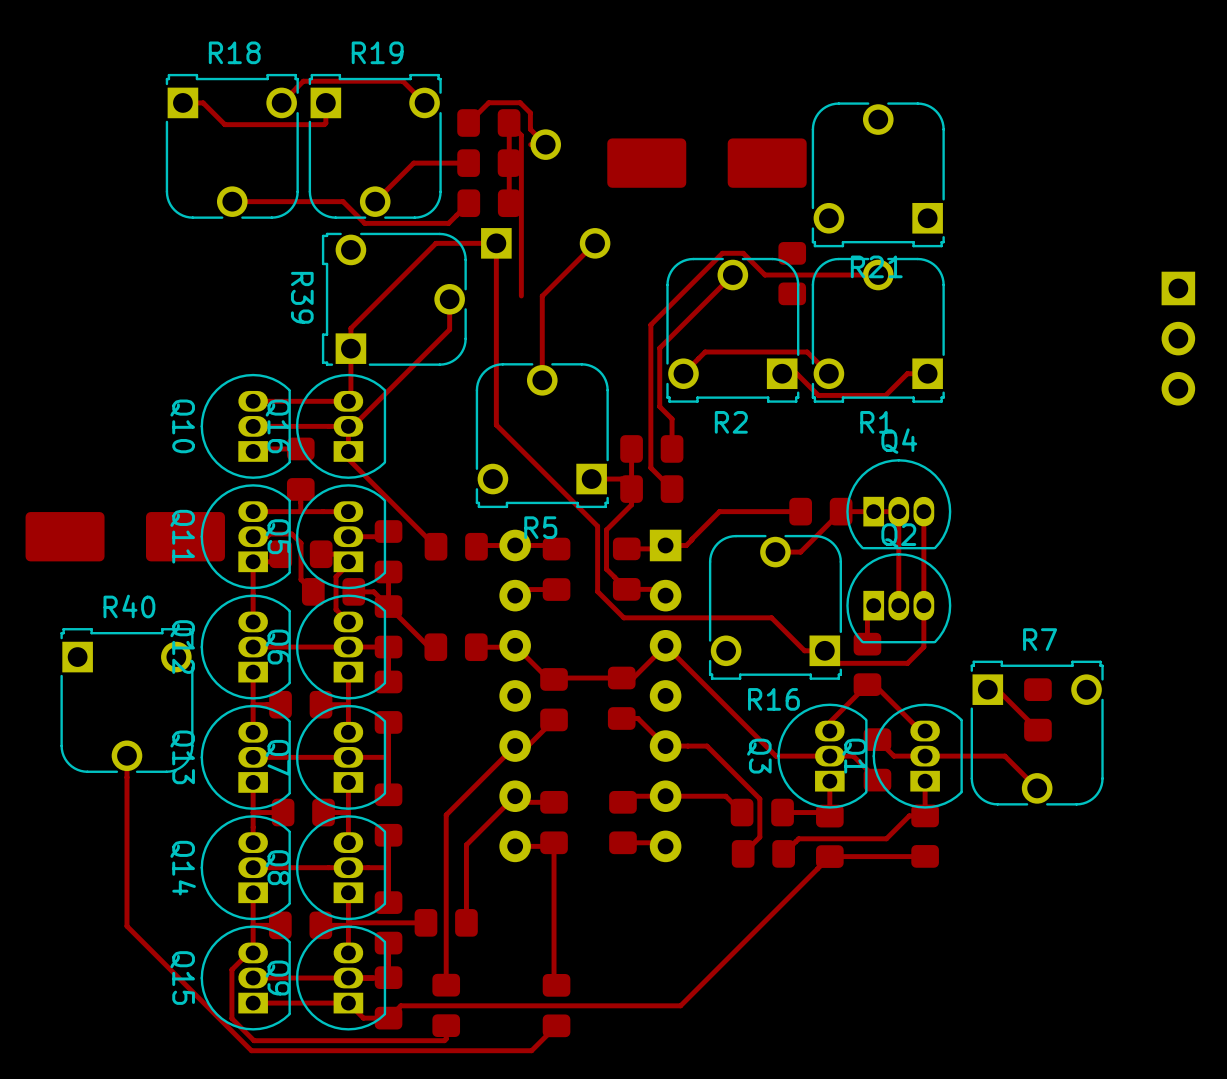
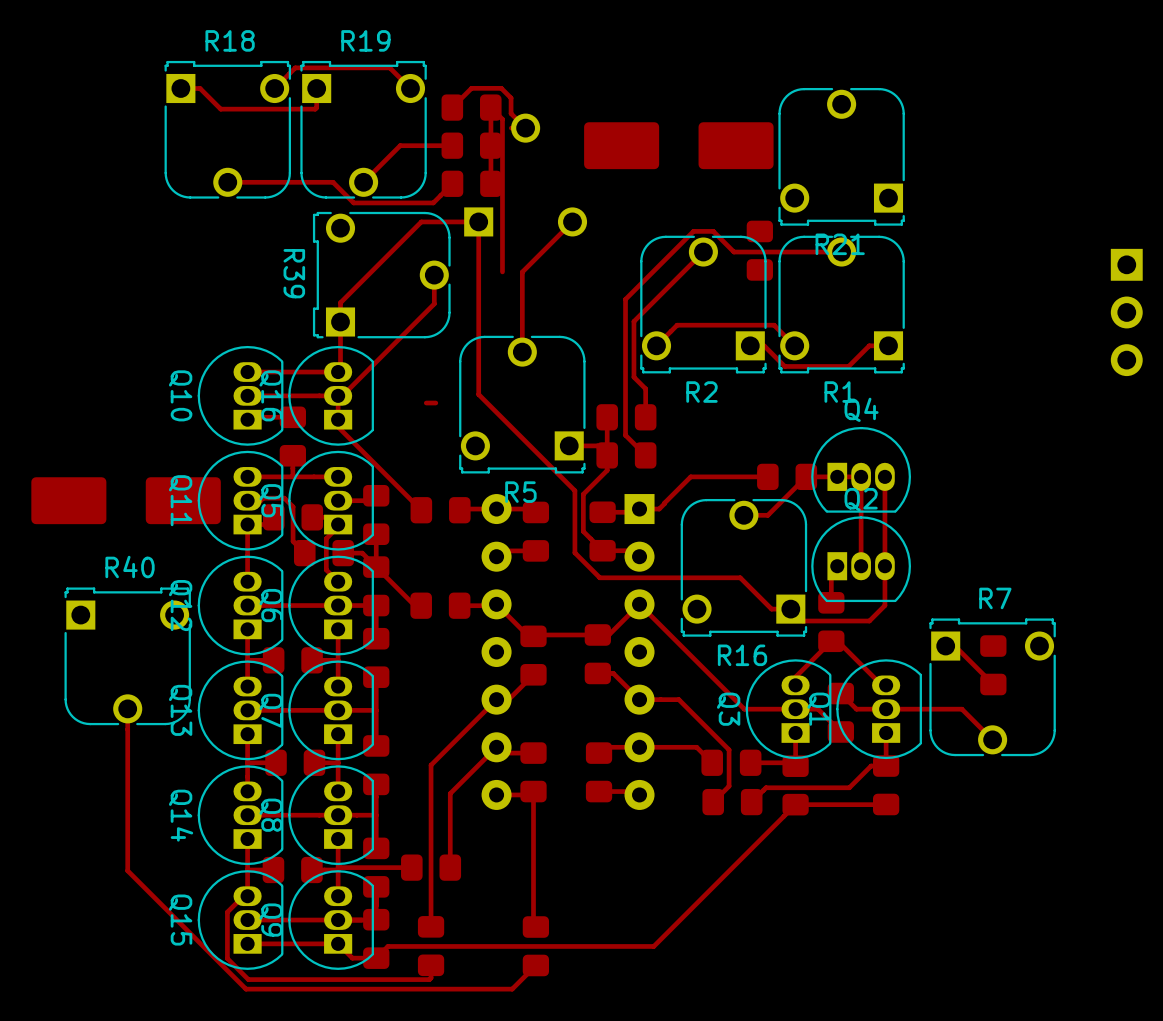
top track: none -> (435, 403) (426, 403)

